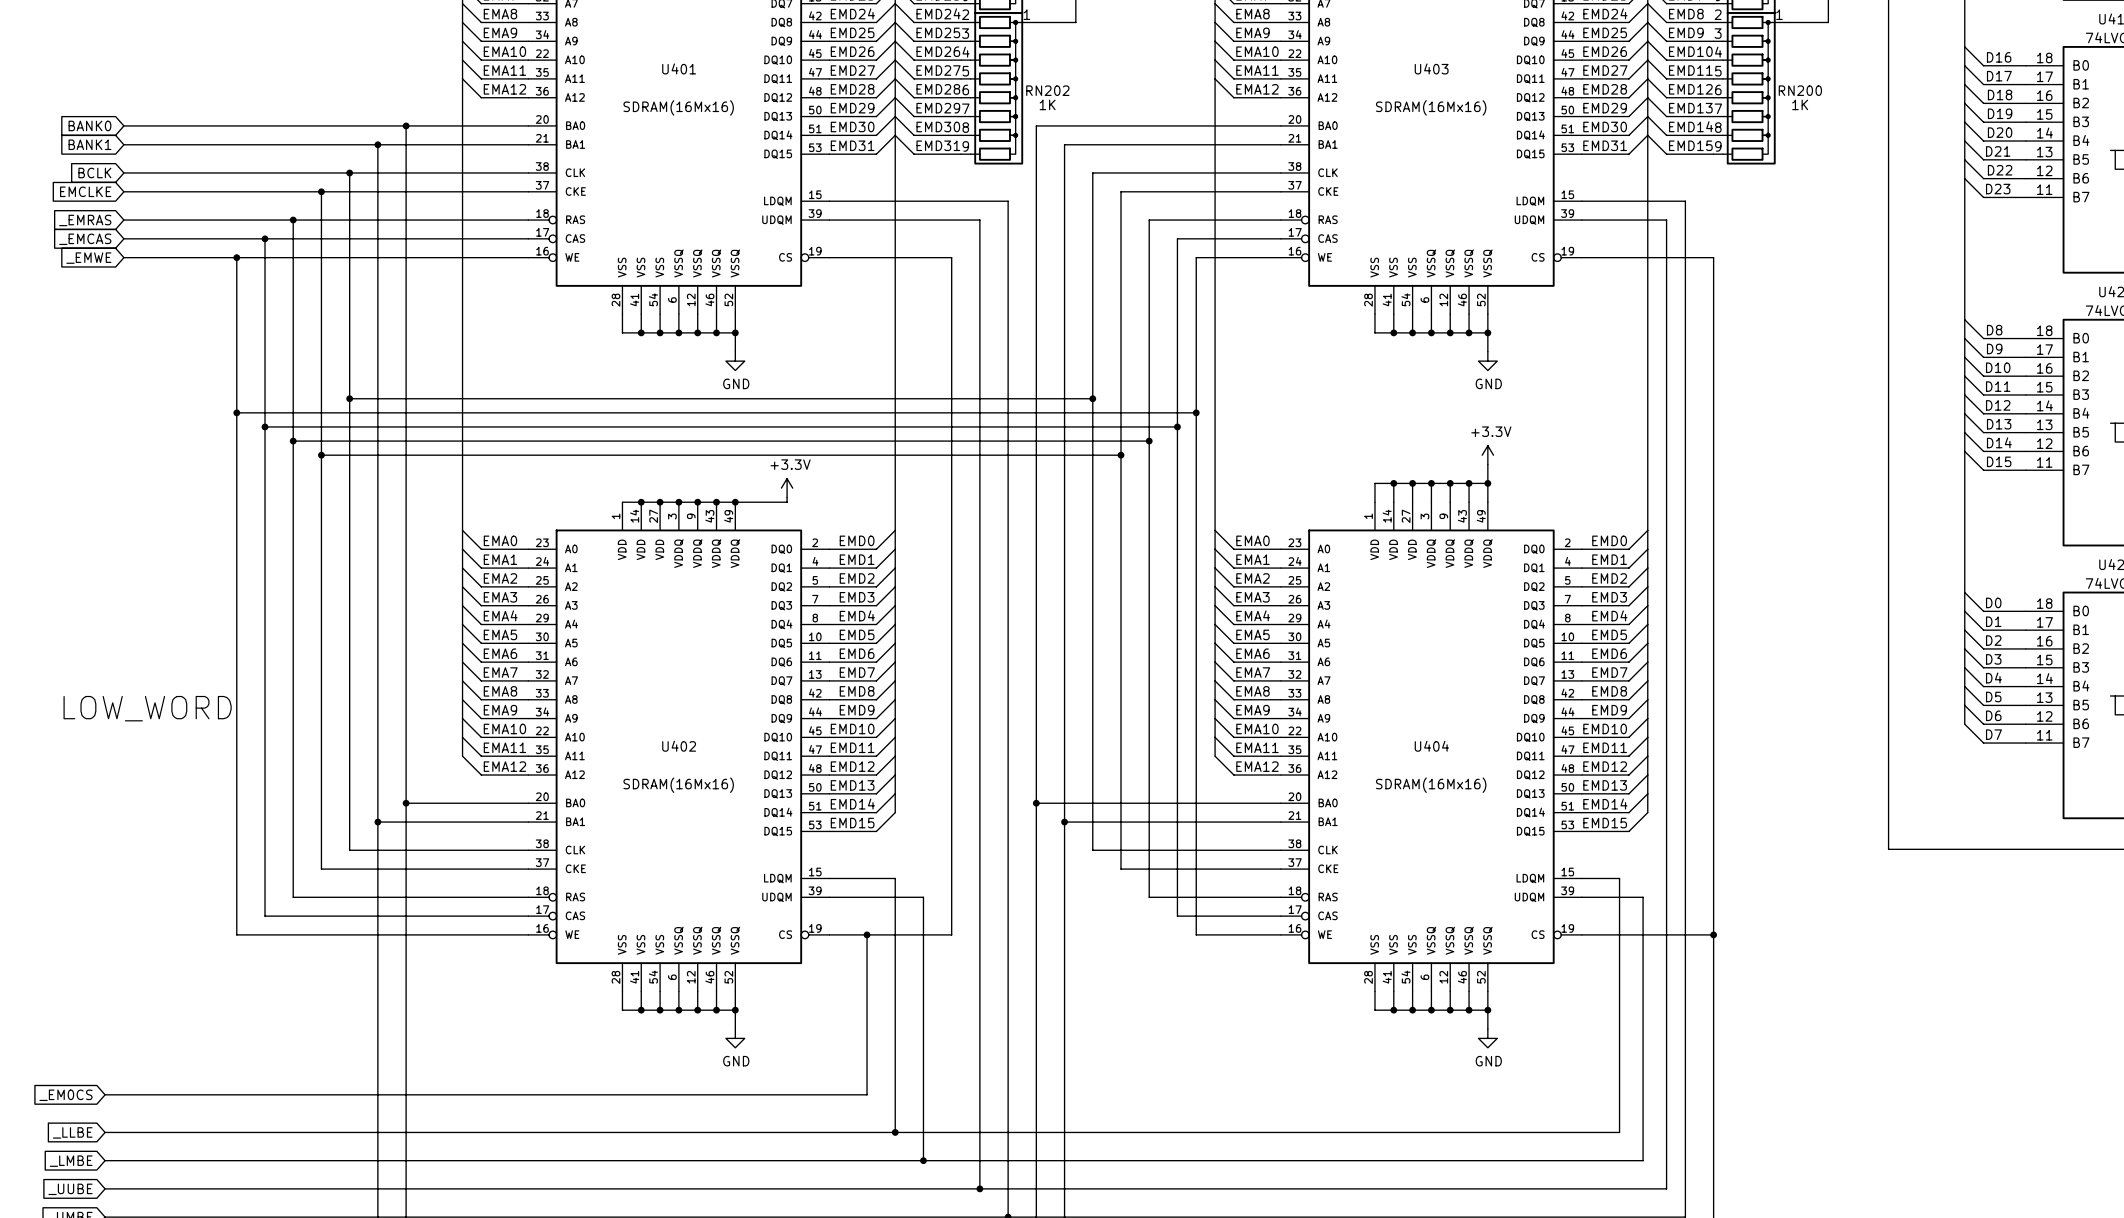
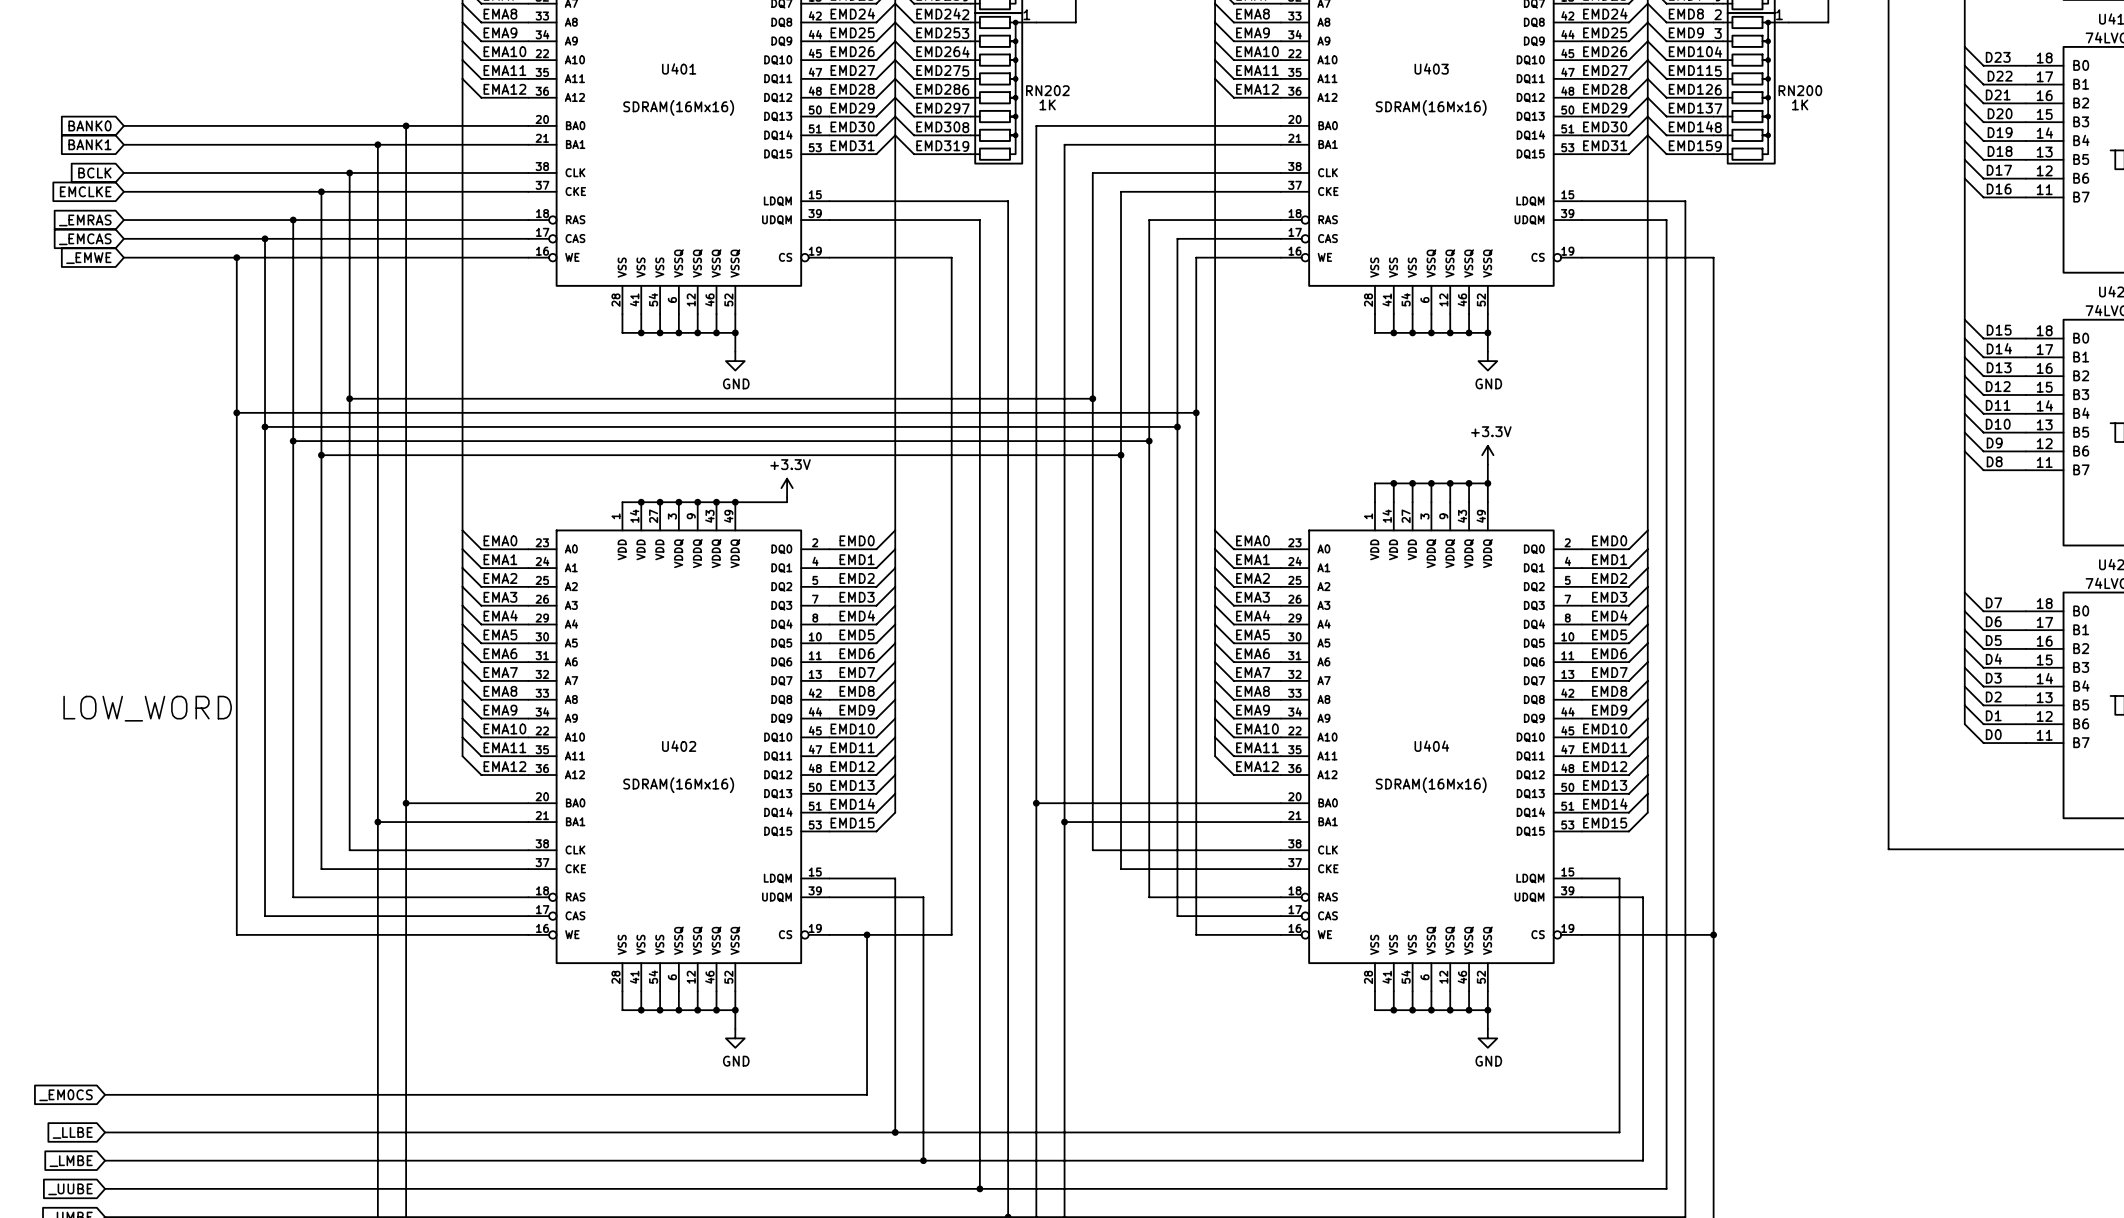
label position: D16 (1999, 57) -> D16 (1999, 189)
label position: D17 (1999, 76) -> D17 (1999, 170)
label position: D18 (2000, 94) -> D18 (2000, 151)
label: D19 (2000, 113) -> D20 (2000, 113)
label: D20 (2000, 132) -> D19 (2000, 132)
label position: D21 (1998, 151) -> D21 (1998, 94)
label position: D22 (2000, 170) -> D22 (2000, 76)
label position: D23 (1998, 189) -> D23 (1998, 57)
label: D8 (1994, 330) -> D15 (1999, 330)
label: D9 (1994, 348) -> D14 (1999, 348)
label position: D10 (1998, 367) -> D10 (1998, 424)
label: D11 (1998, 386) -> D12 (1998, 386)
label: D12 (1998, 405) -> D11 (1998, 405)
label position: D13 (1999, 424) -> D13 (1999, 367)
label: D14 (1999, 442) -> D9 (1994, 443)
label: D15 (1999, 461) -> D8 (1994, 461)
label: D0 (1993, 602) -> D7 (1993, 602)
label: D1 (1993, 621) -> D6 (1993, 621)
label: D2 (1993, 640) -> D5 (1993, 640)
label: D3 (1993, 659) -> D4 (1993, 659)
label: D4 (1993, 677) -> D3 (1993, 678)
label: D5 (1993, 697) -> D2 (1993, 697)
label: D6 (1993, 715) -> D1 (1993, 715)
label: D7 (1993, 734) -> D0 (1993, 734)

